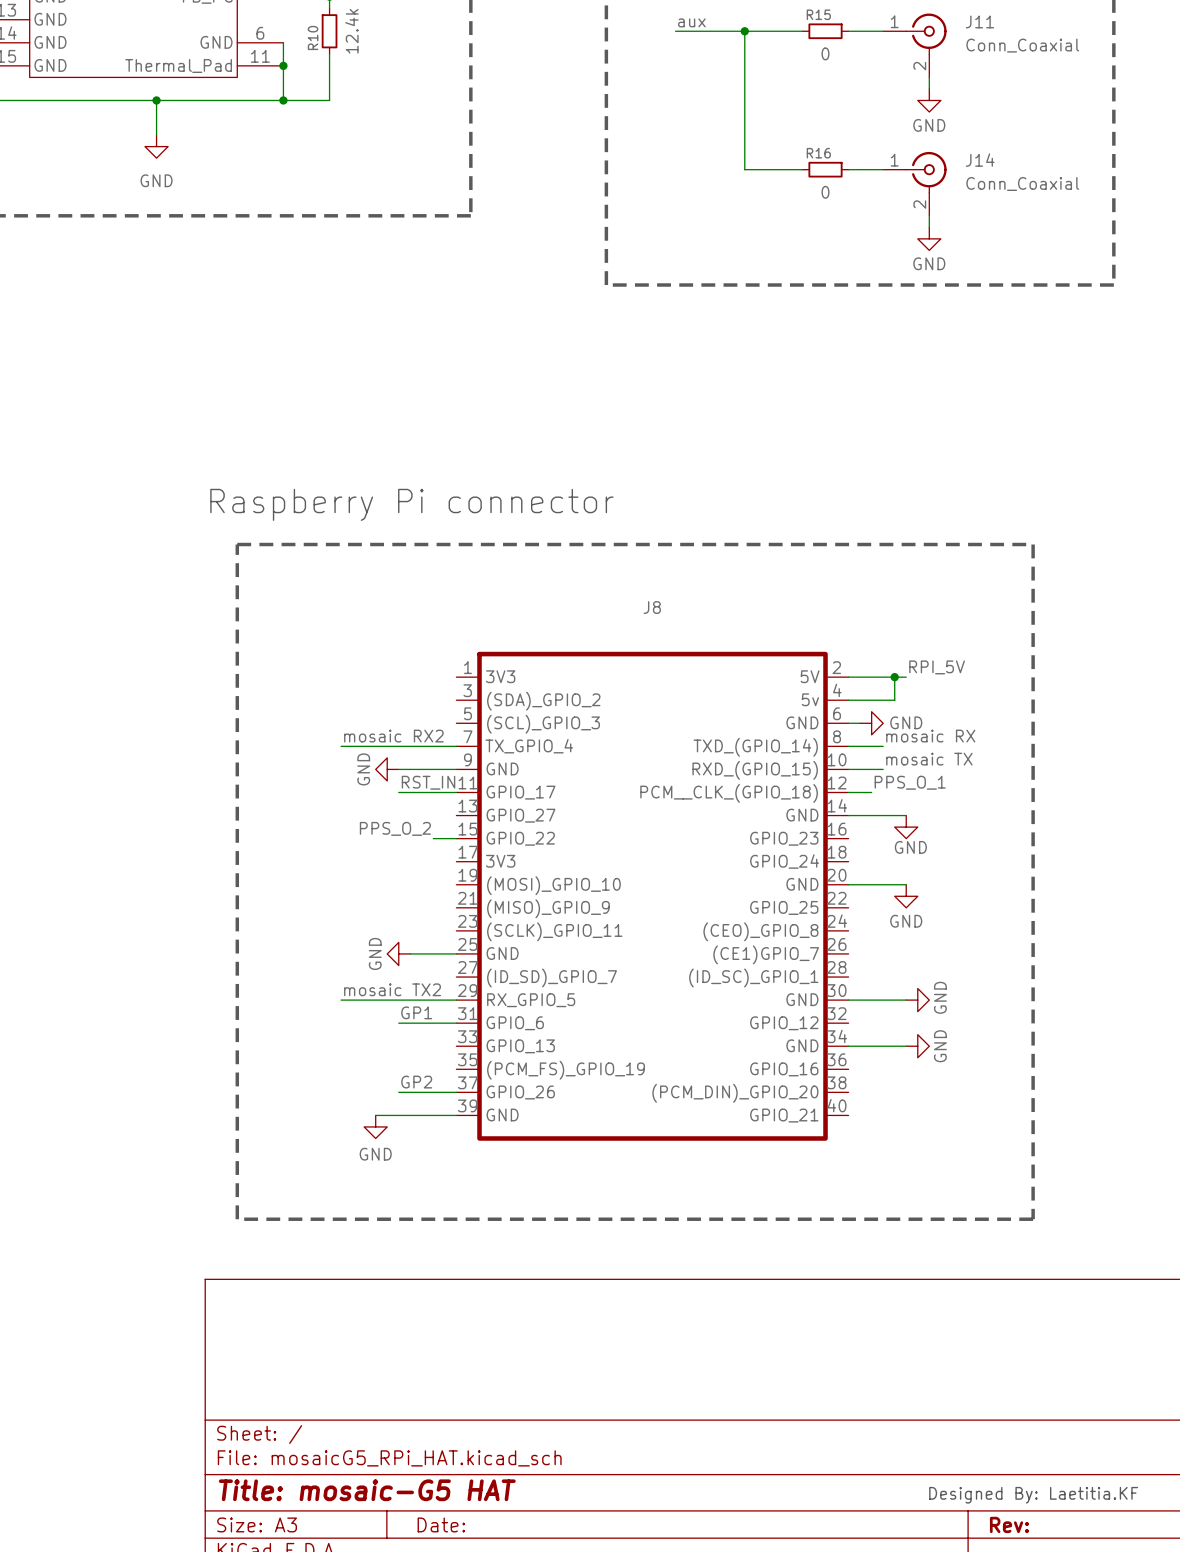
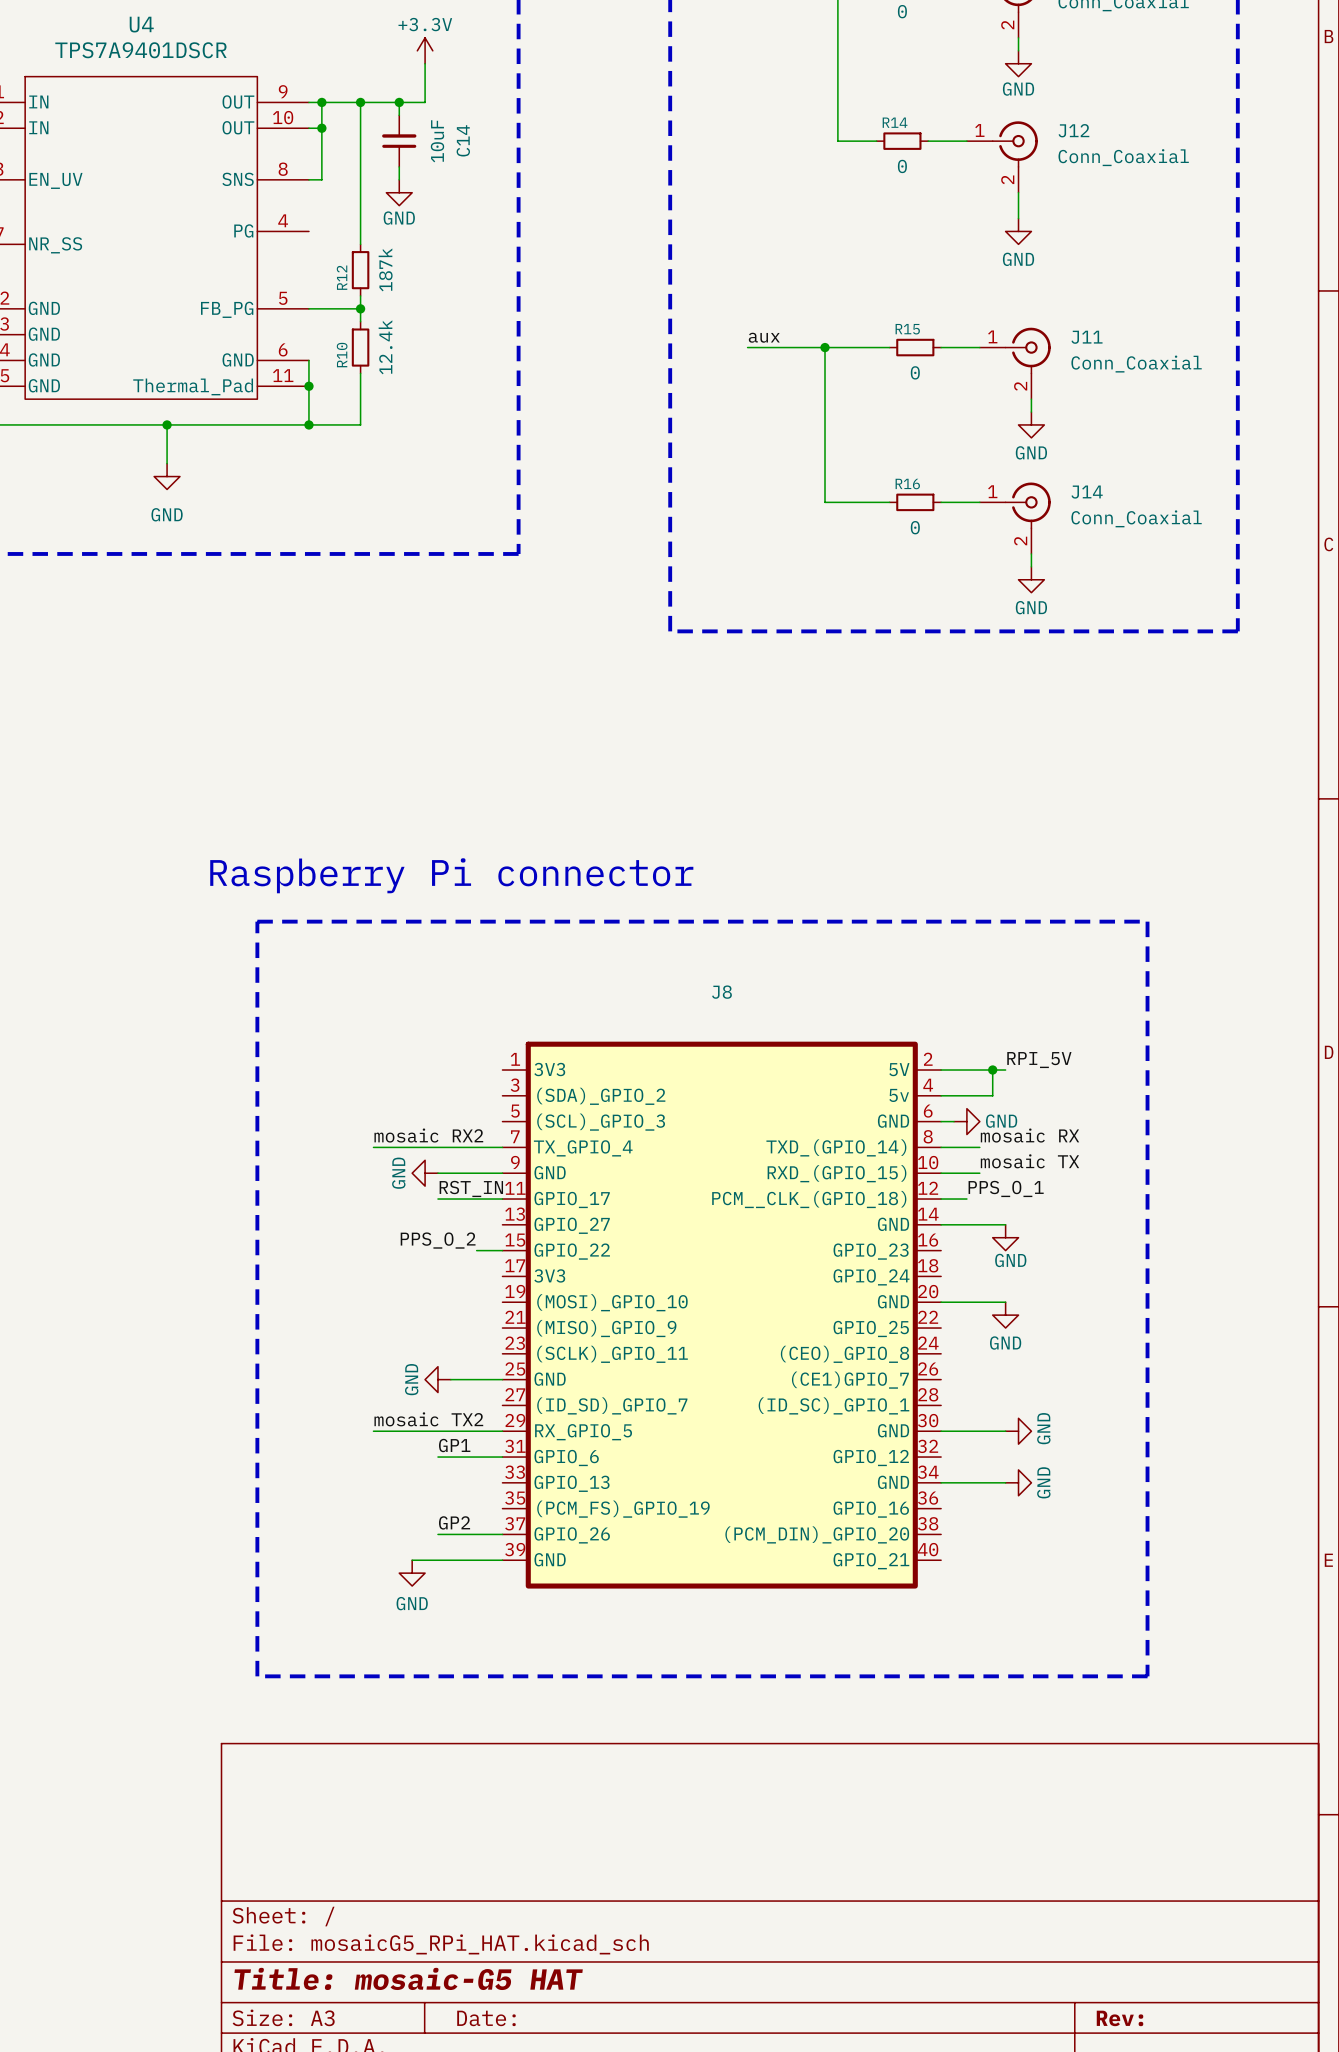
text: Designed By: Laetitia.KF (1033, 1495) -> none

